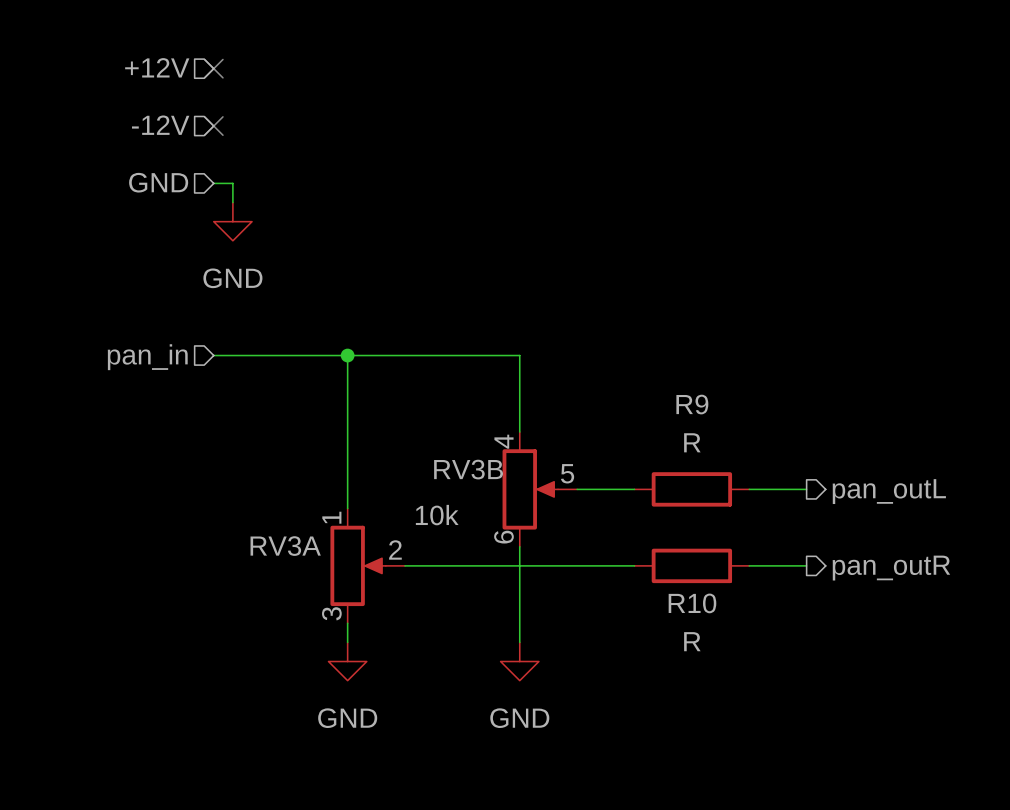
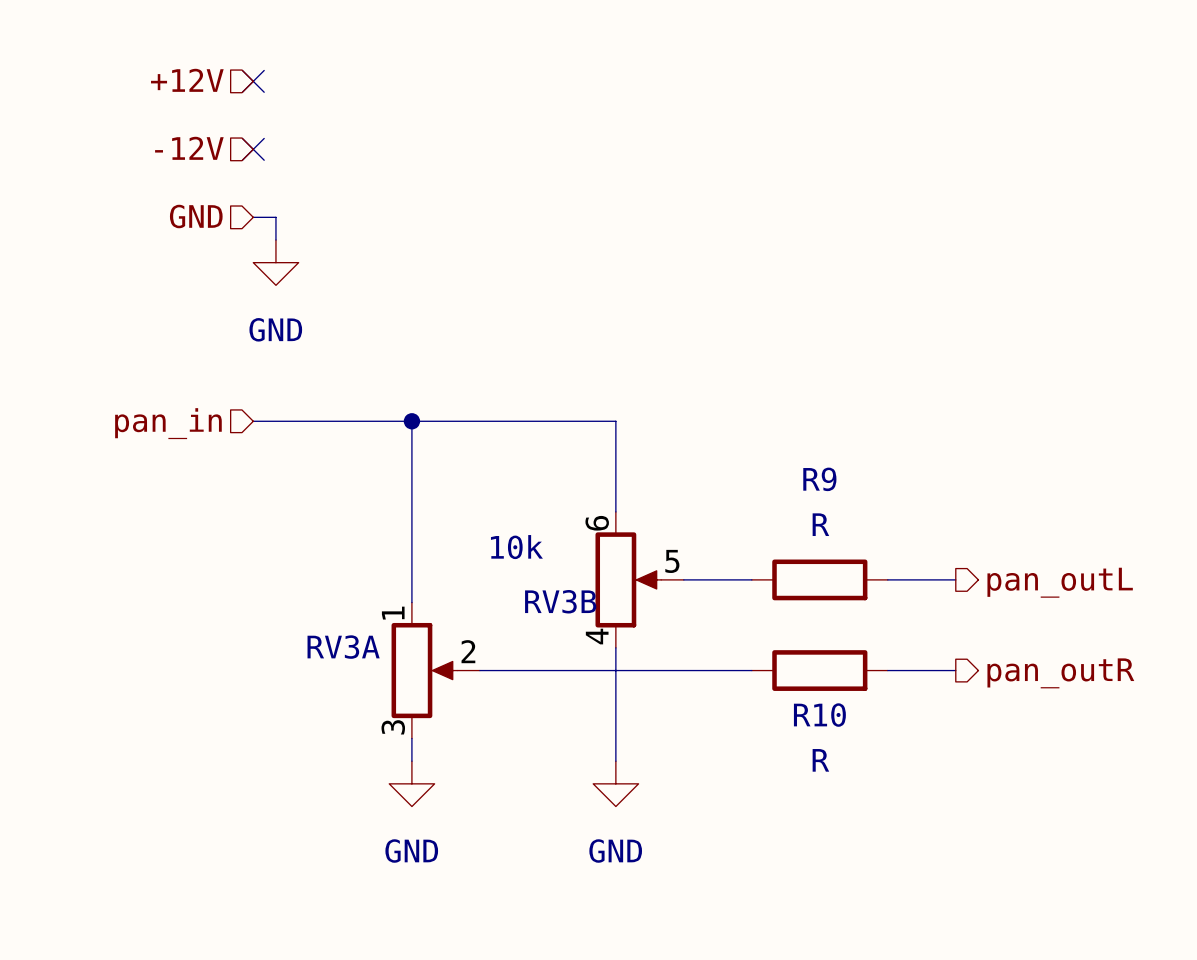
RV3B flip: as is (530, 489) -> up-down (628, 579)

